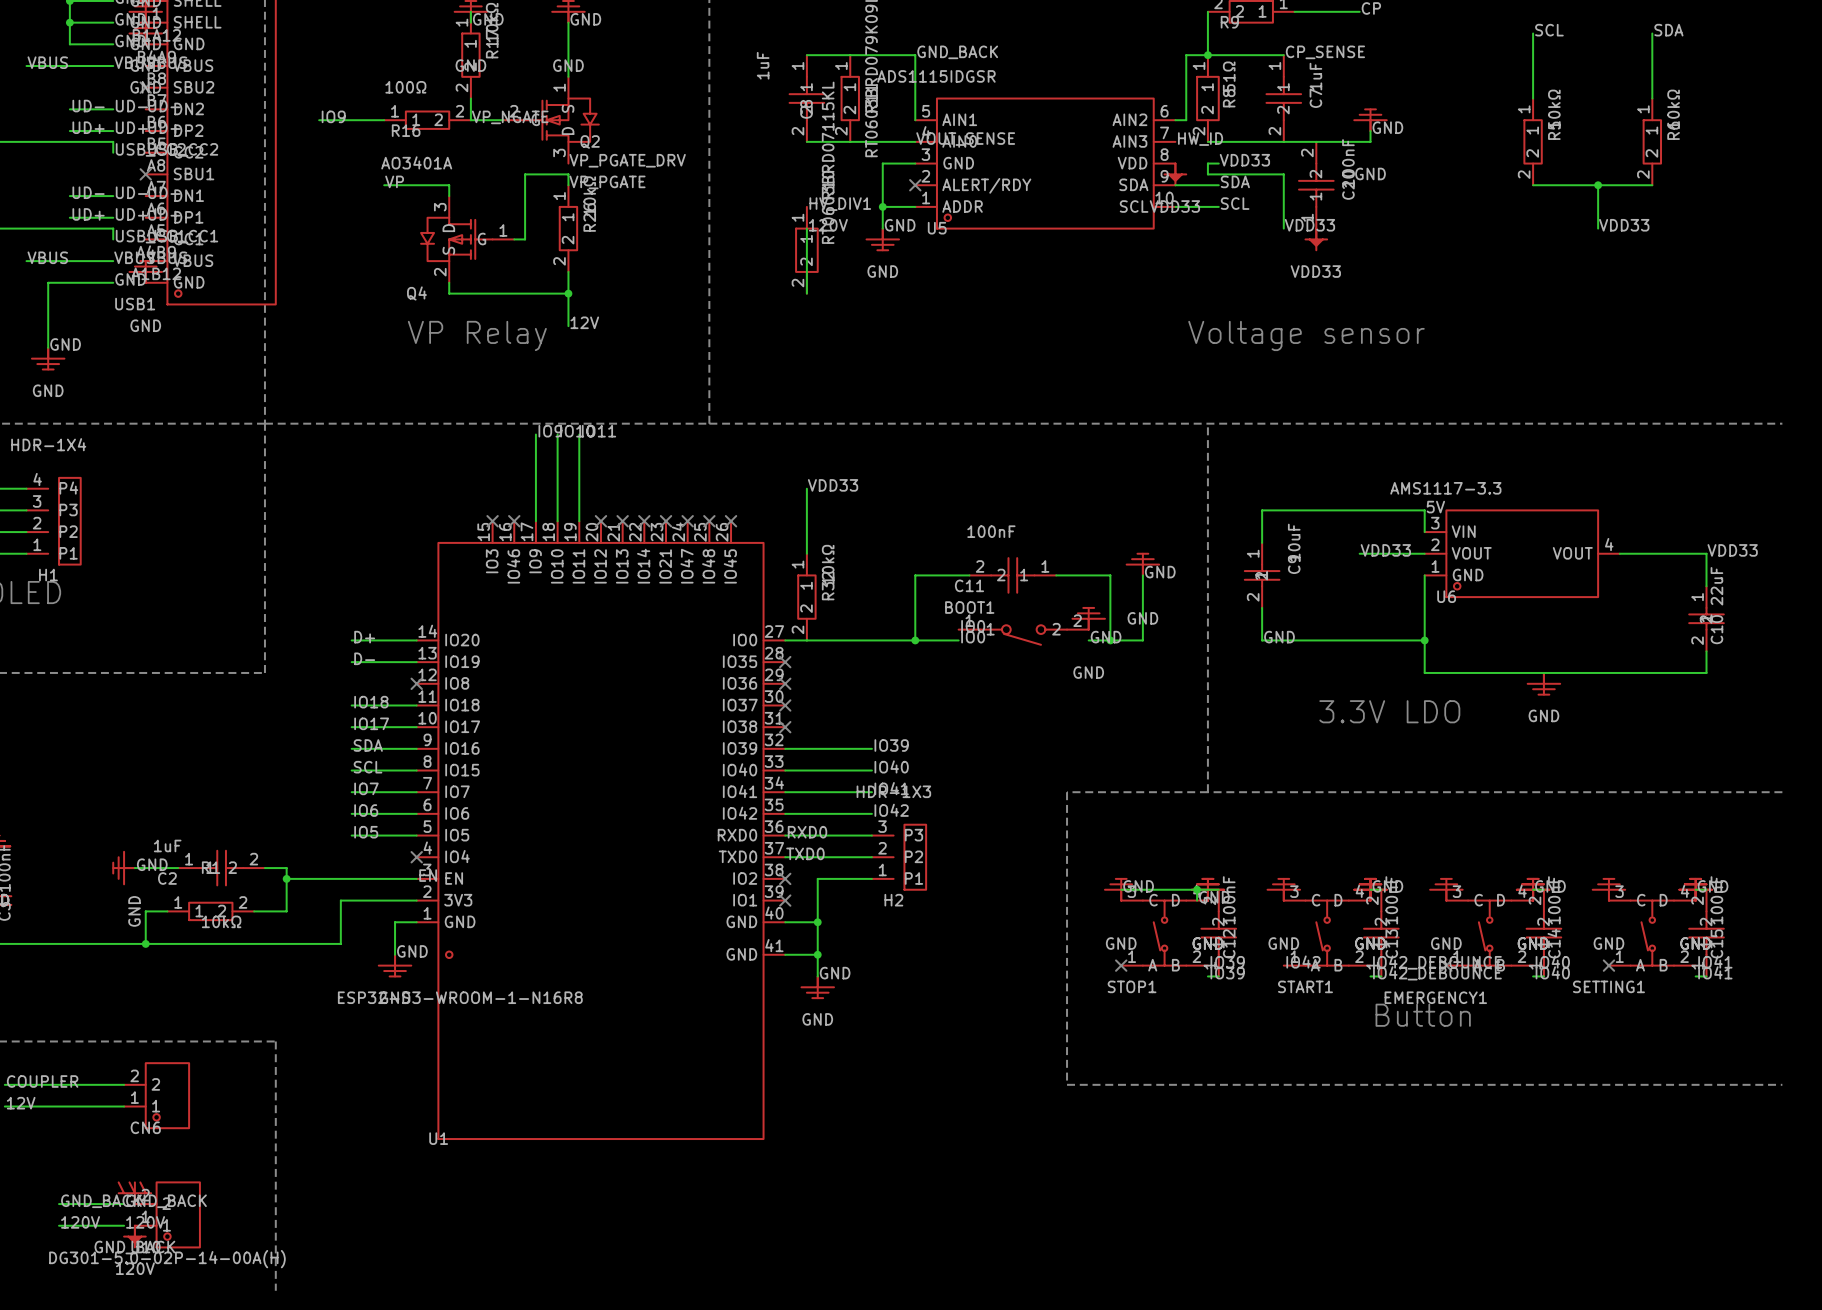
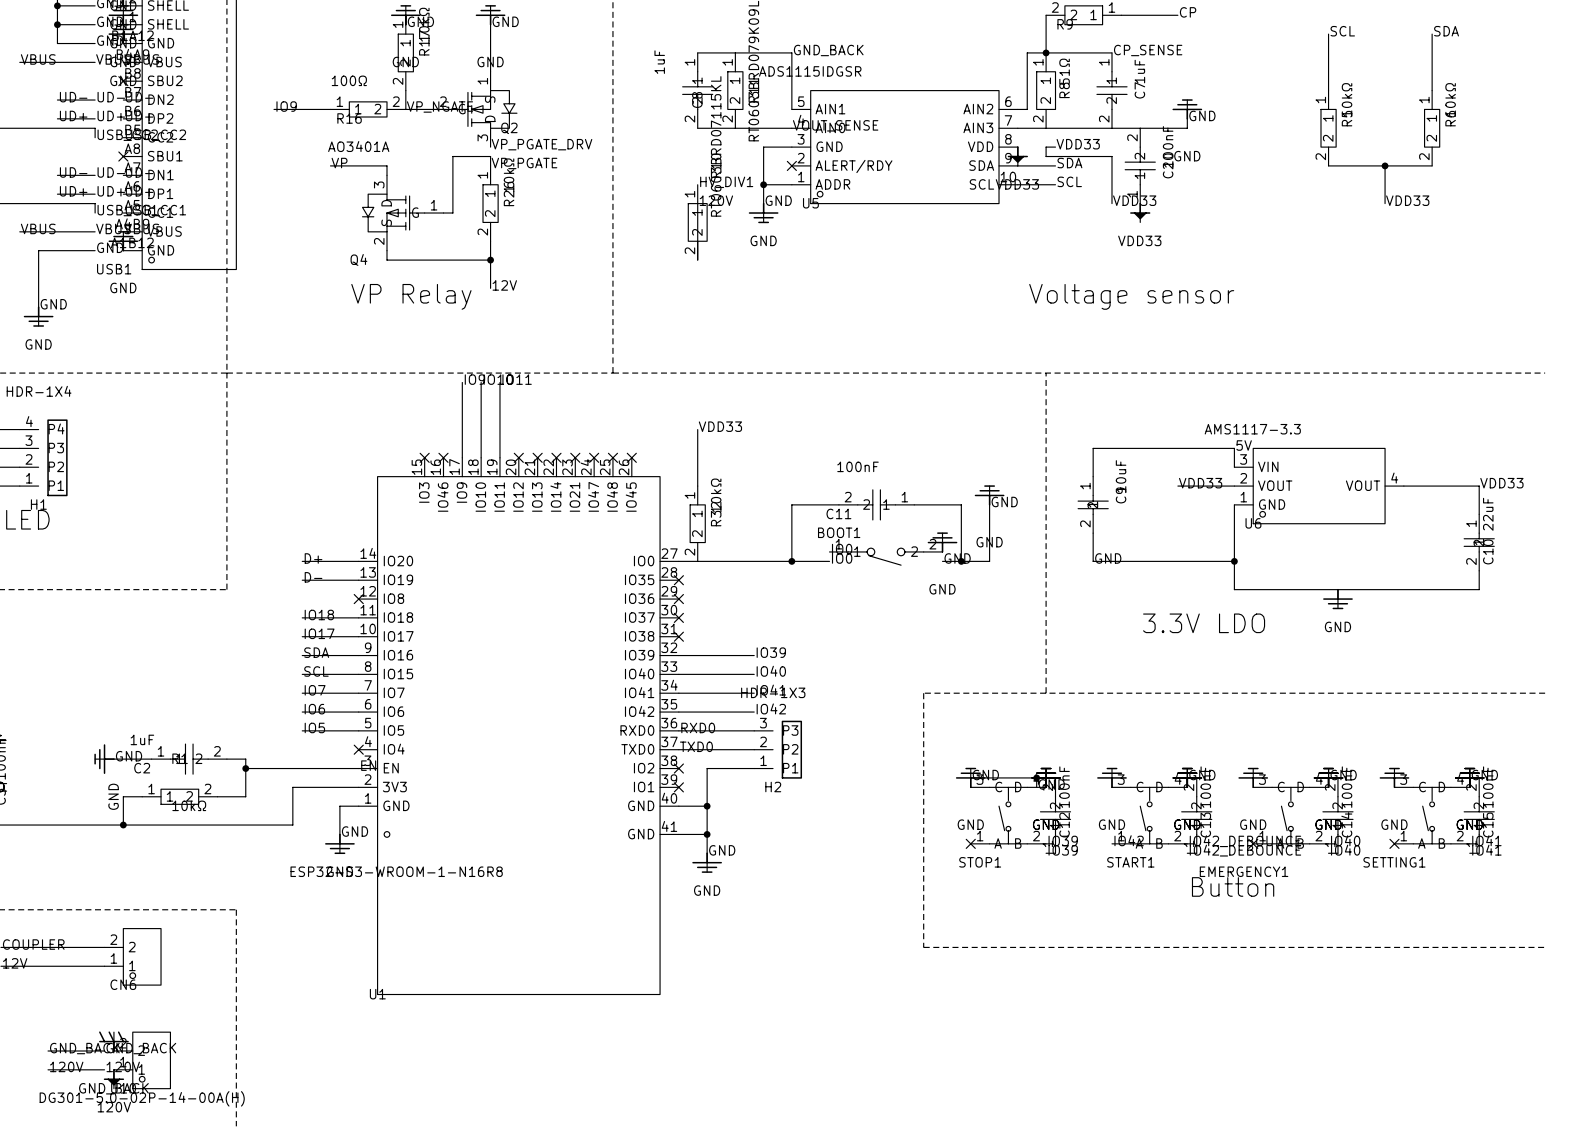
label: HW_ID (1200, 139) -> none
wire: none -> (1017, 128) (1046, 128)

